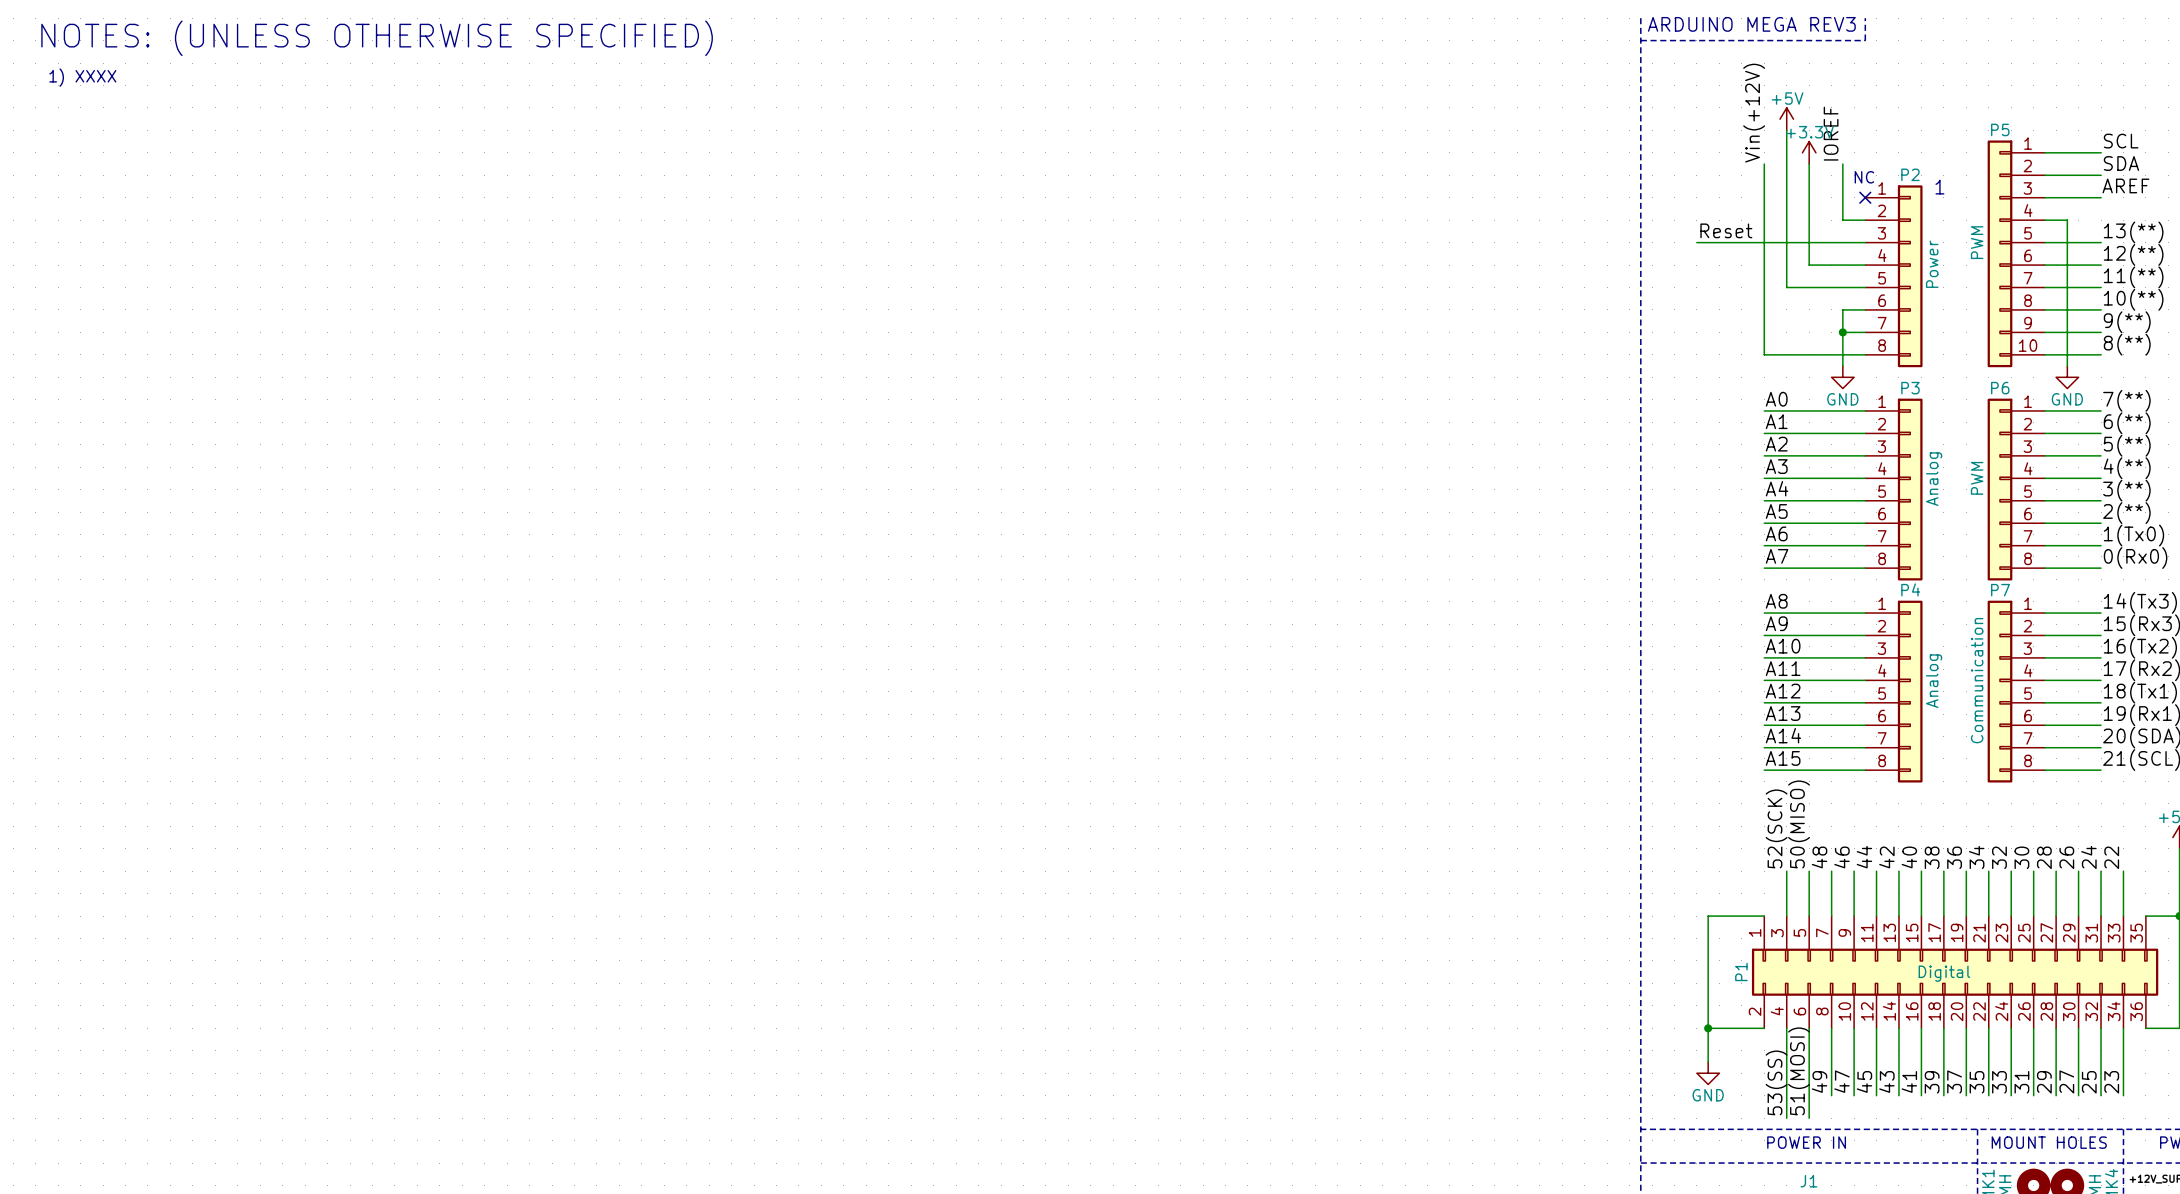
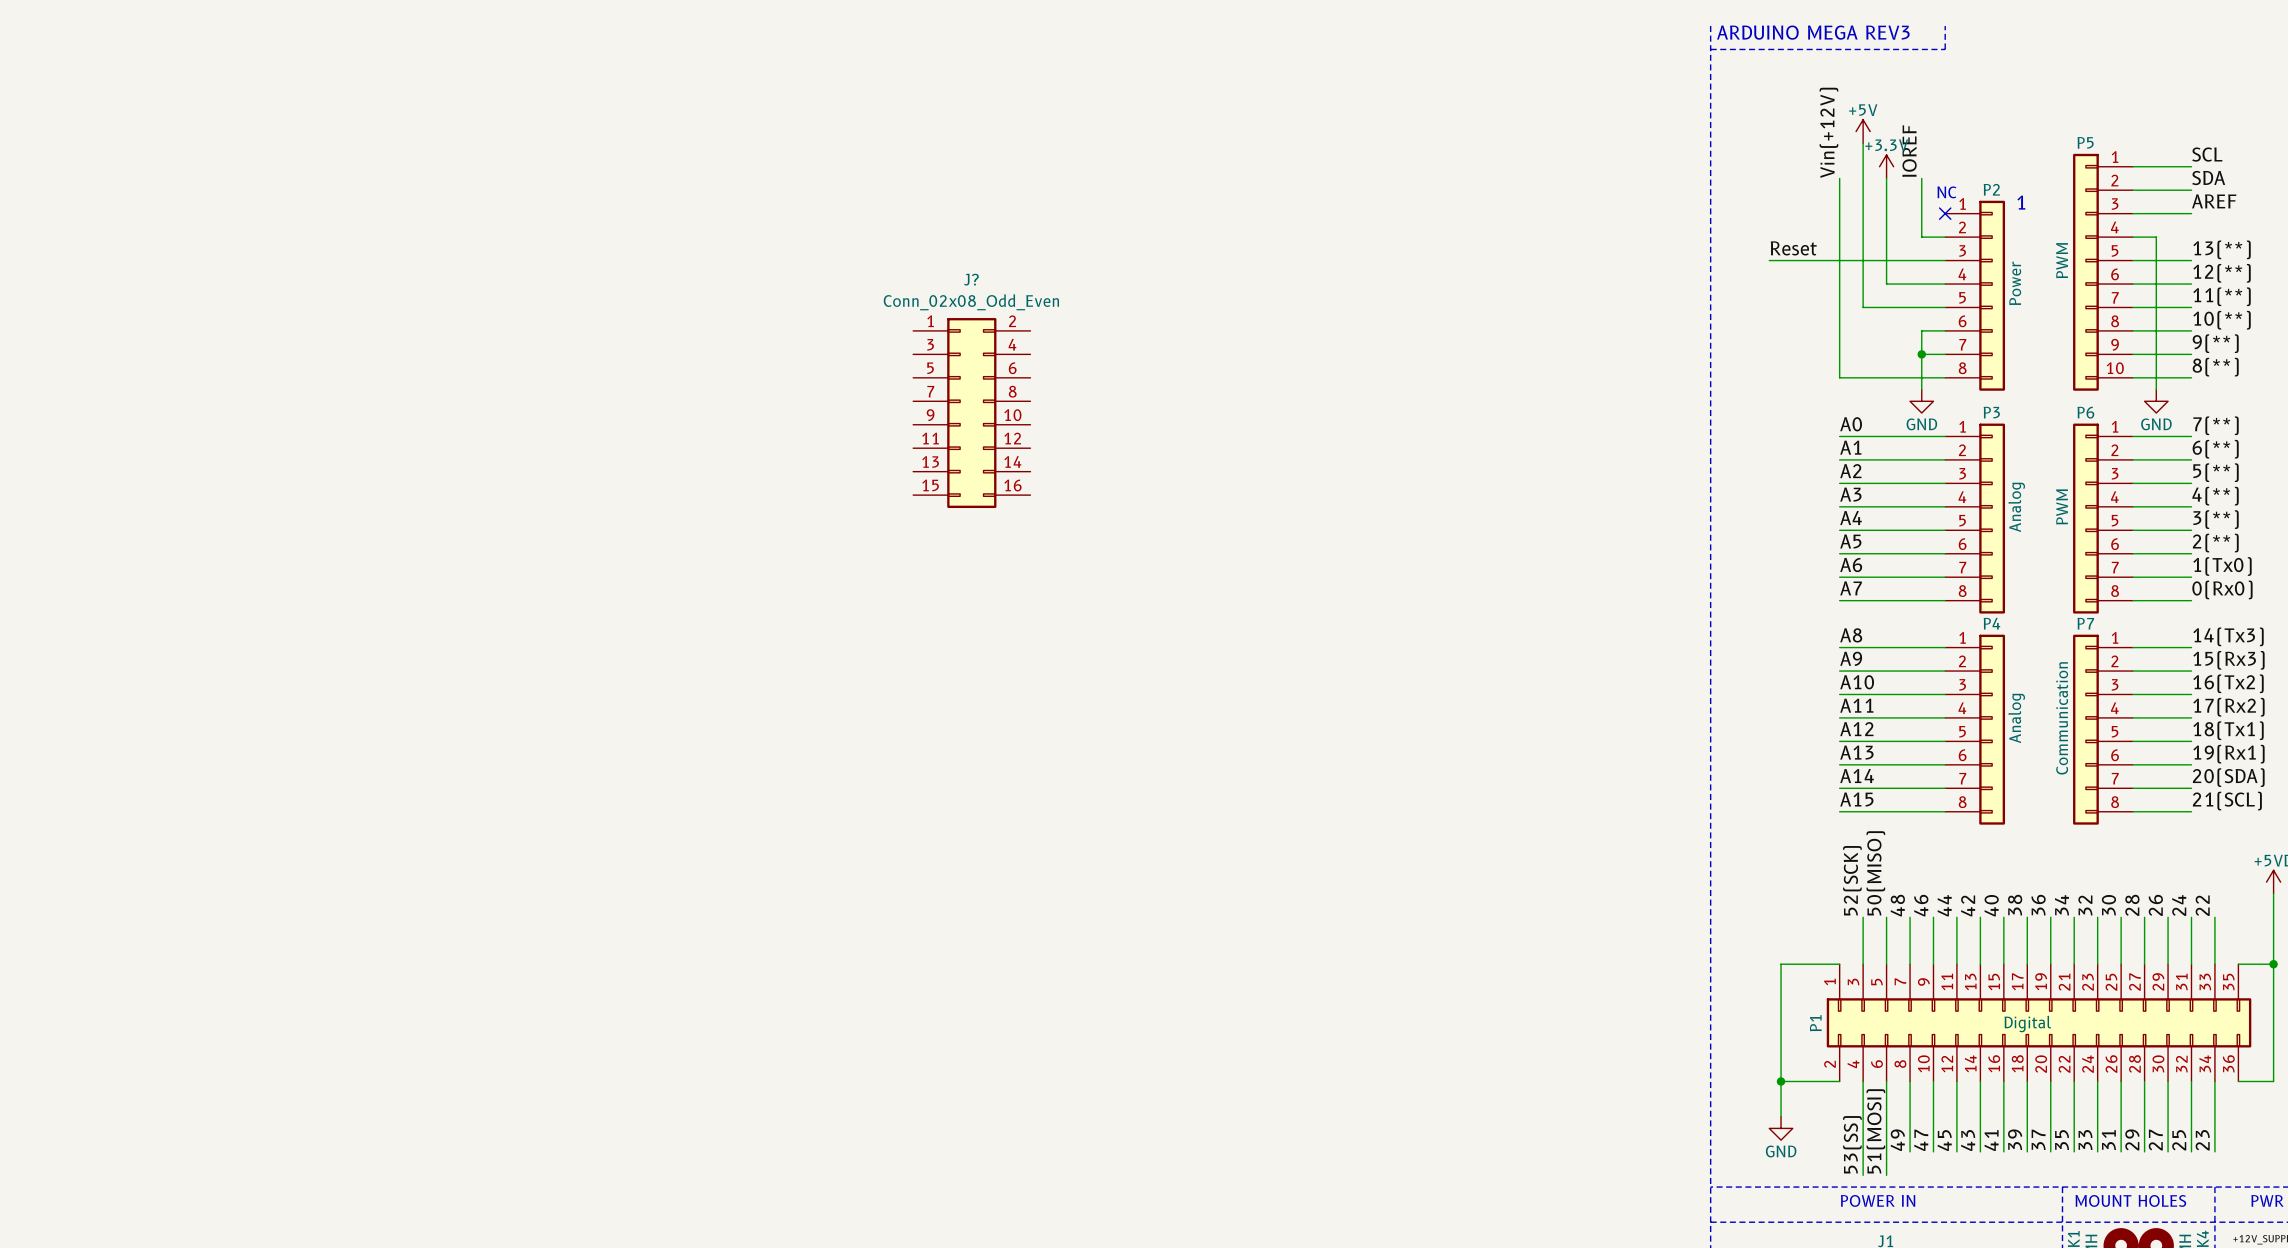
text: NOTES: (UNLESS OTHERWISE SPECIFIED) (377, 38) -> none
text: 1) XXXX (82, 77) -> none
J?: none -> Conn_02x08_Odd_Even (971, 413)

